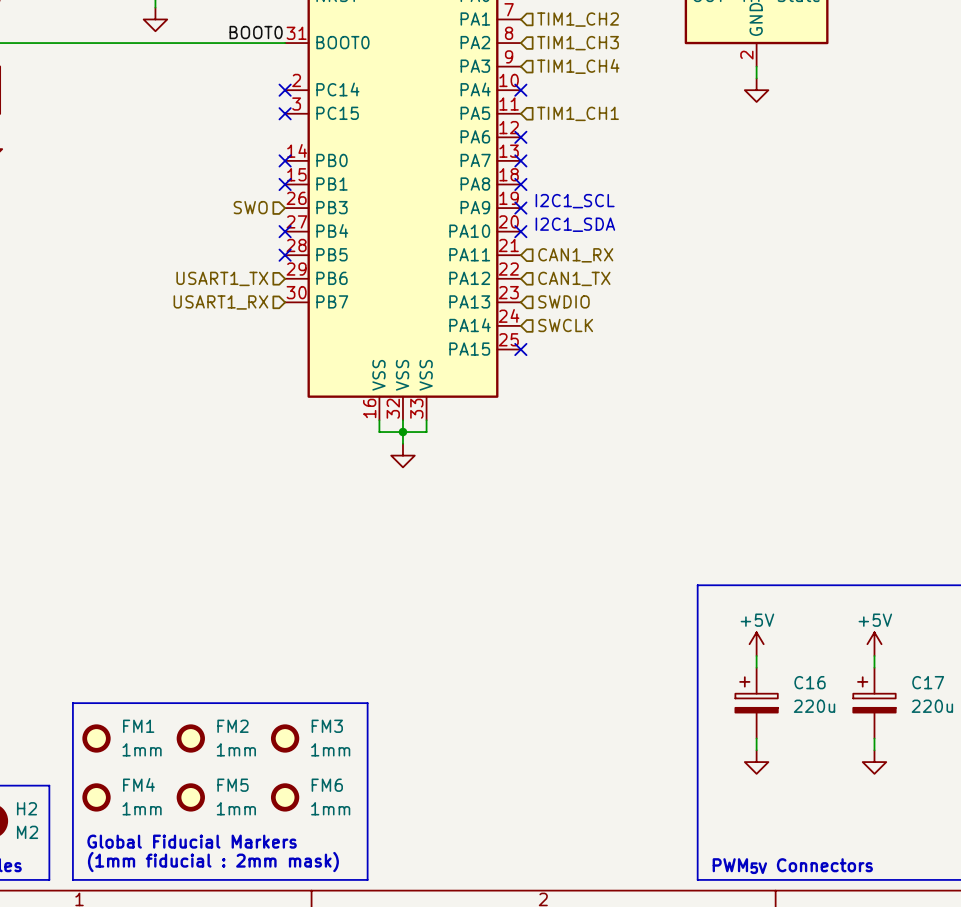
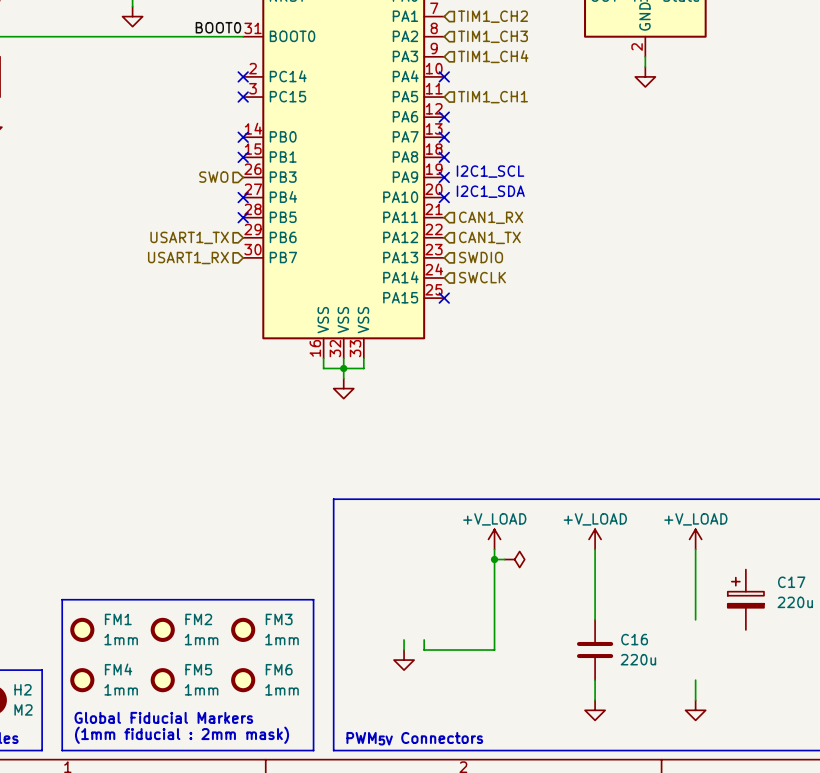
line: (697, 585) (697, 879) -> (595, 499) (333, 499) (333, 750) (595, 750)
power symbol: none -> +V_LOAD (494, 539)
power symbol: none -> +V_LOAD (595, 539)
power symbol: none -> +V_LOAD (695, 539)
wire: none -> (494, 549) (494, 650) (424, 650) (424, 639)
power symbol: +5V (756, 644) -> none
wire: none -> (695, 549) (695, 619)
power symbol: +5V (874, 644) -> none
wire: none -> (494, 559) (504, 559)
junction: none -> (494, 559)
power symbol: none -> (514, 559)
wire: (756, 655) (756, 667) -> none
wire: (874, 655) (874, 667) -> none
C16 symbol: [735, 667, 778, 739] -> [576, 619, 614, 681]
wire: (756, 738) (756, 750) -> none
wire: (874, 738) (874, 750) -> none
wire: none -> (404, 639) (404, 650)
power symbol: (756, 762) -> none
power symbol: (874, 762) -> none
power symbol: none -> (404, 660)
wire: none -> (695, 680) (695, 700)
power symbol: none -> (595, 710)
power symbol: none -> (695, 710)
text: none -> PWM5V Connectors (414, 738)
text: PWM5V Connectors (792, 866) -> none

